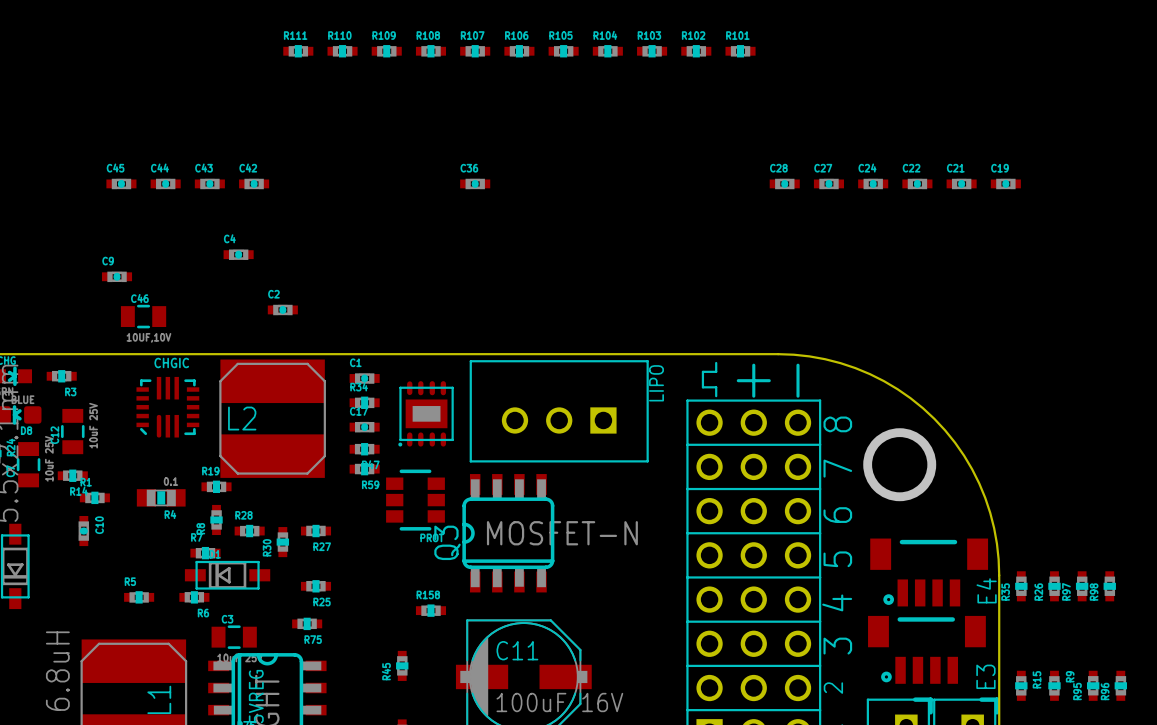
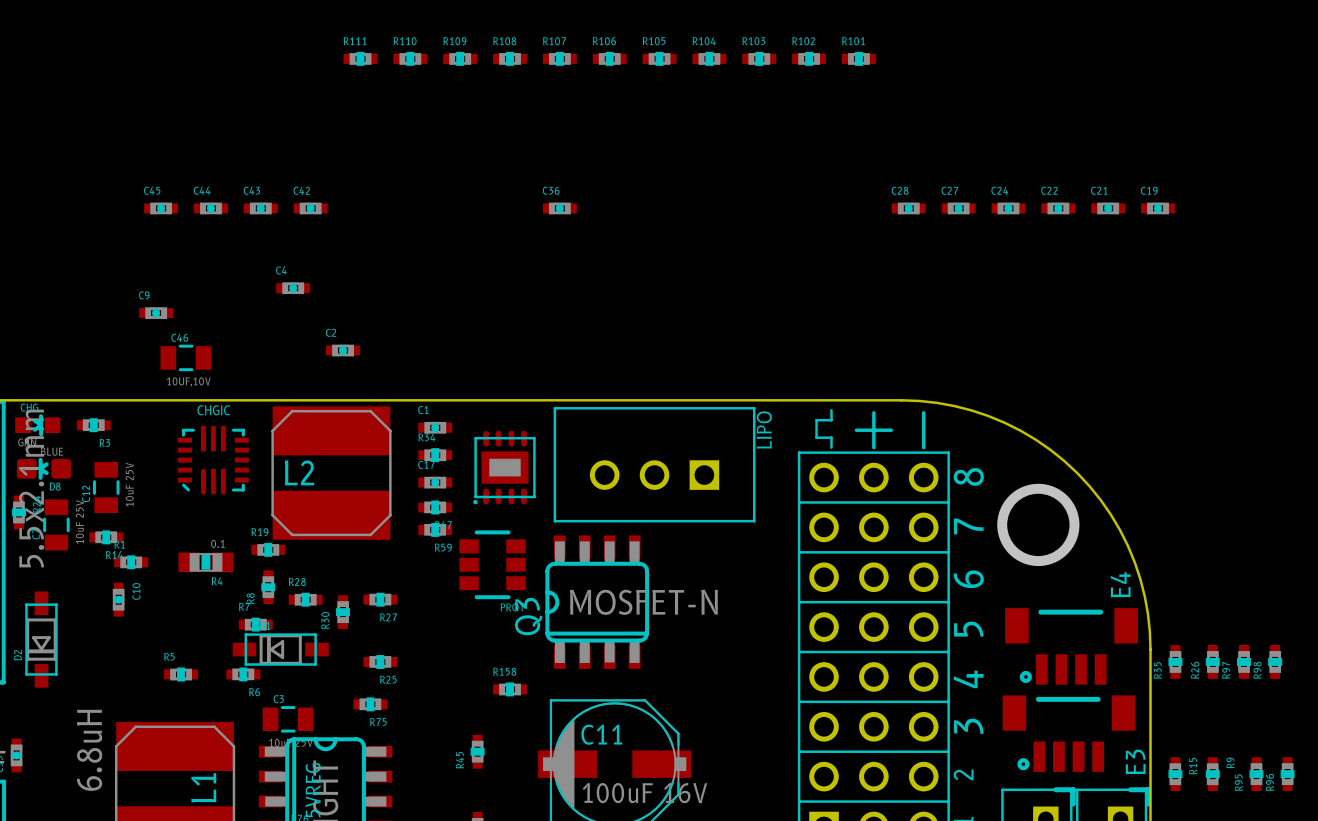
E4 name position: E4 (986, 590) -> E4 (1120, 584)

